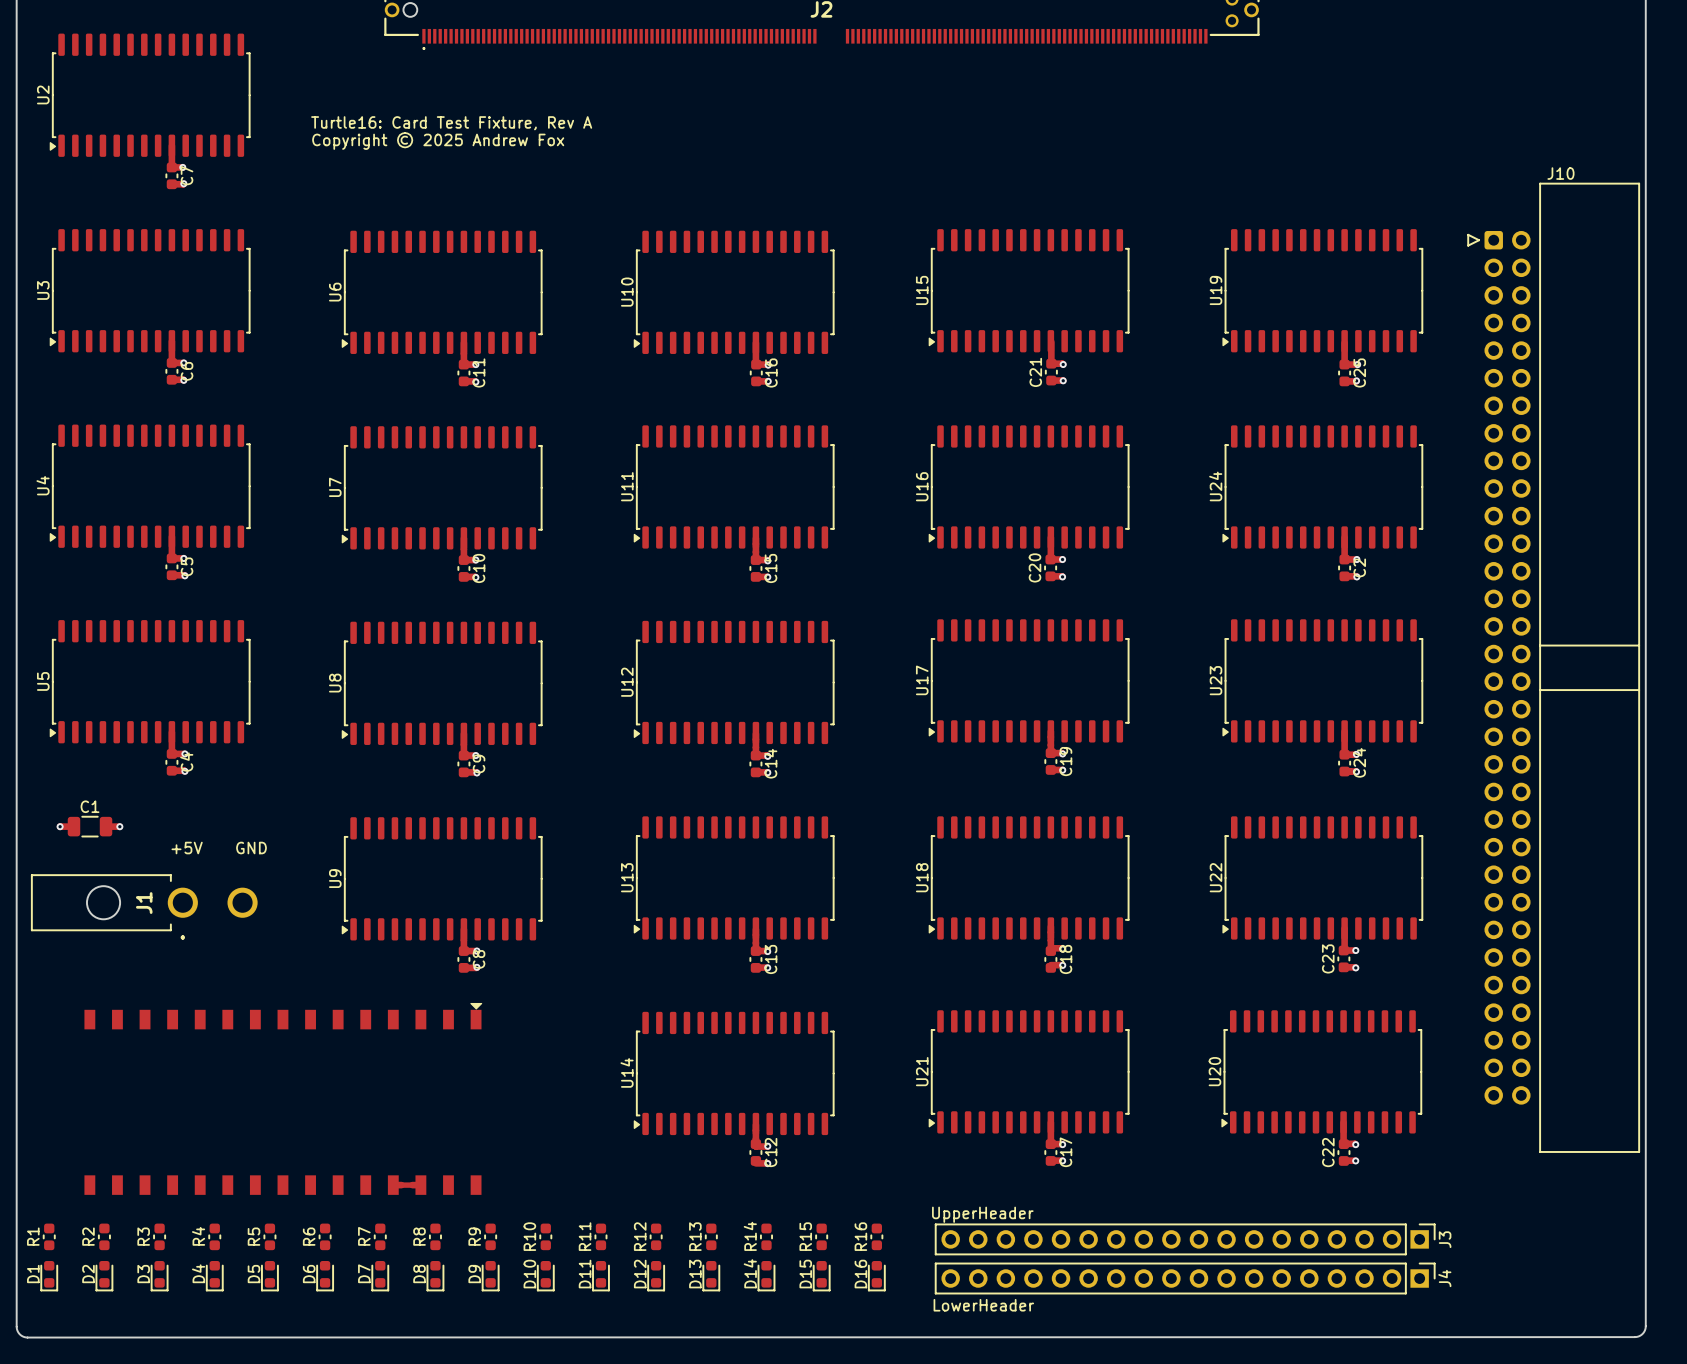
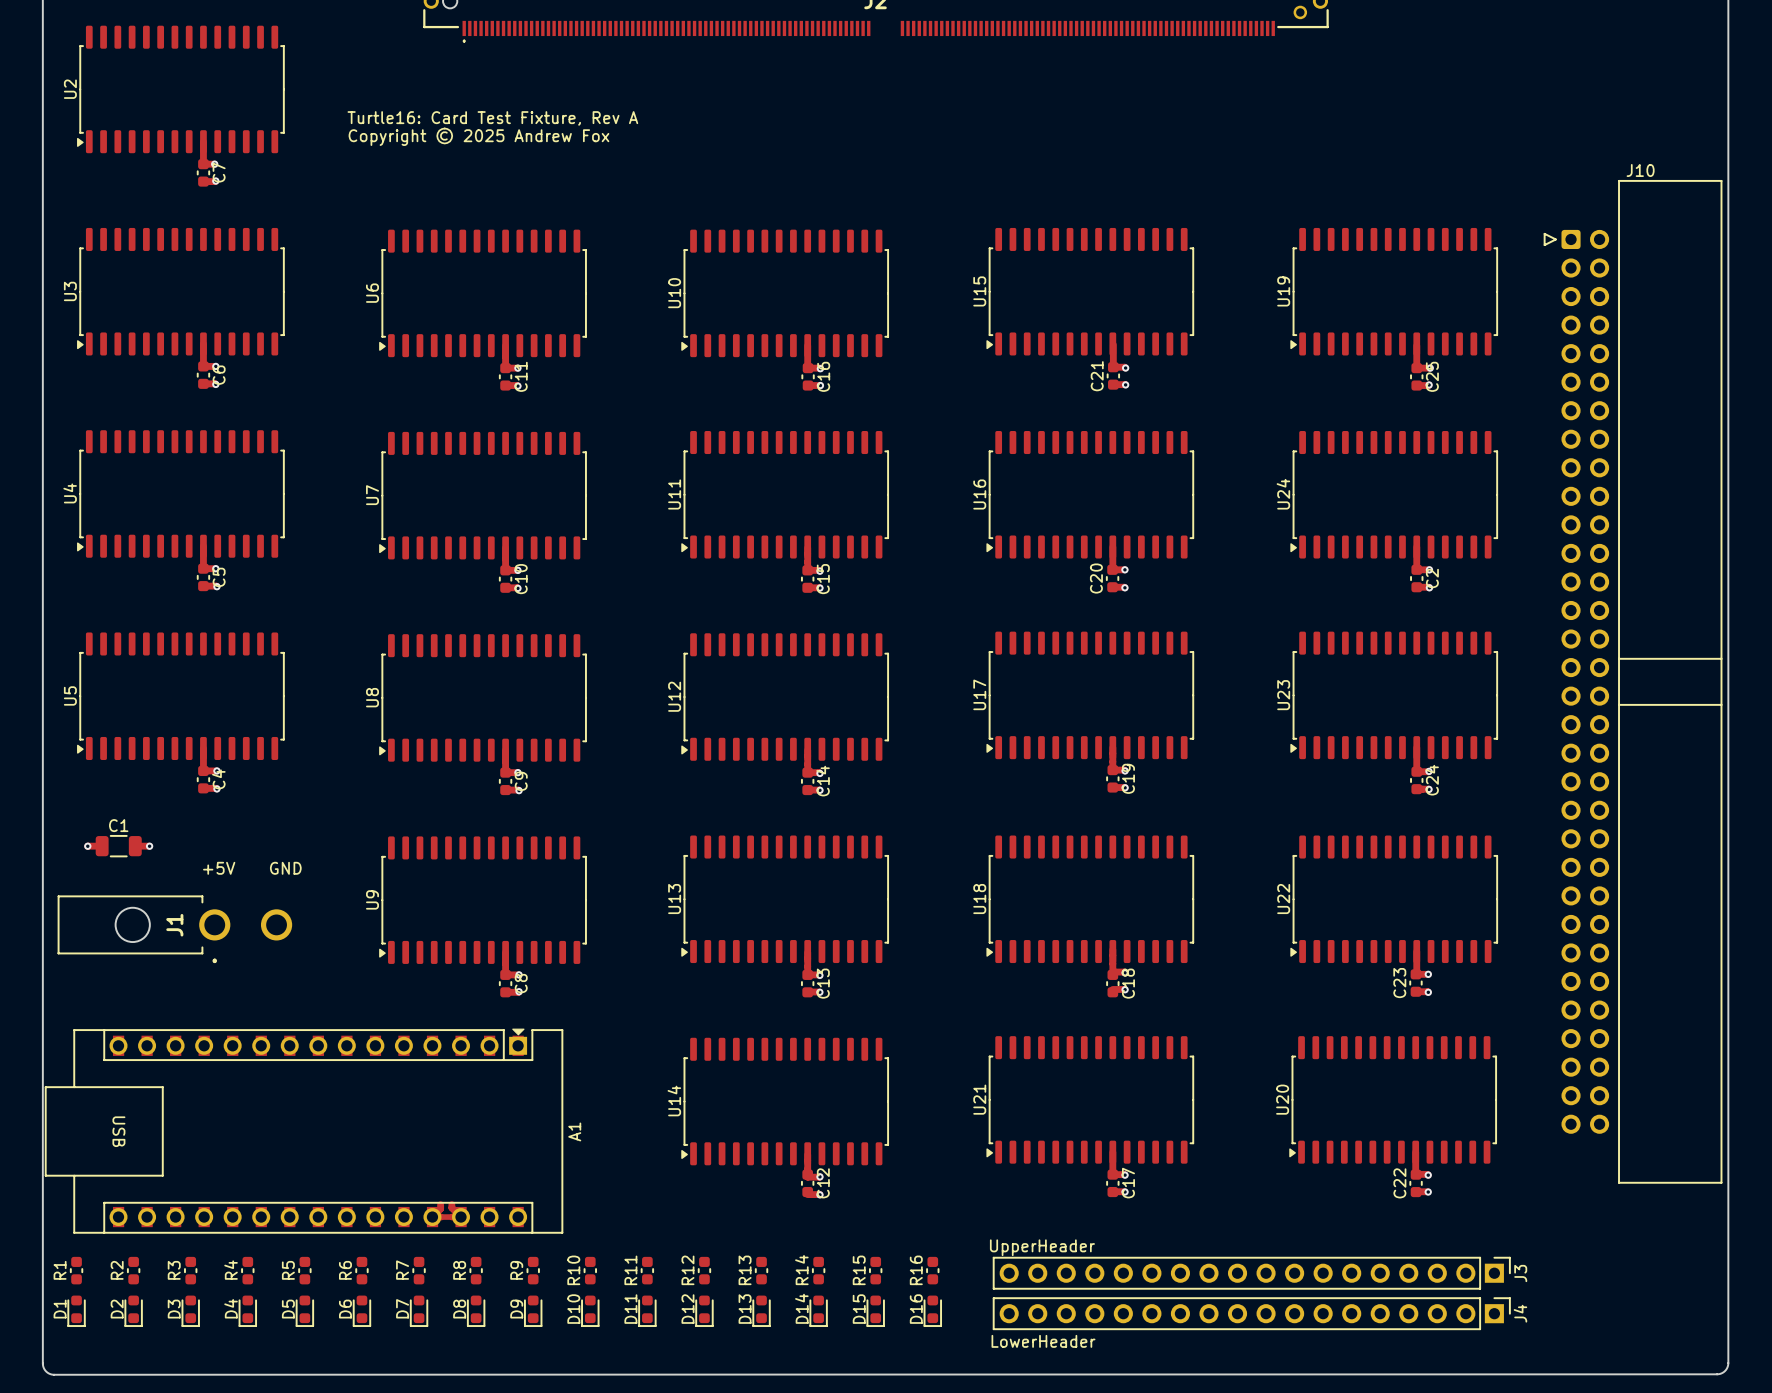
A1: none -> (304, 1131)
top track: none -> (440, 1204) (440, 1208) (432, 1217)
top track: none -> (451, 1204) (451, 1207) (461, 1217) (461, 1213)

